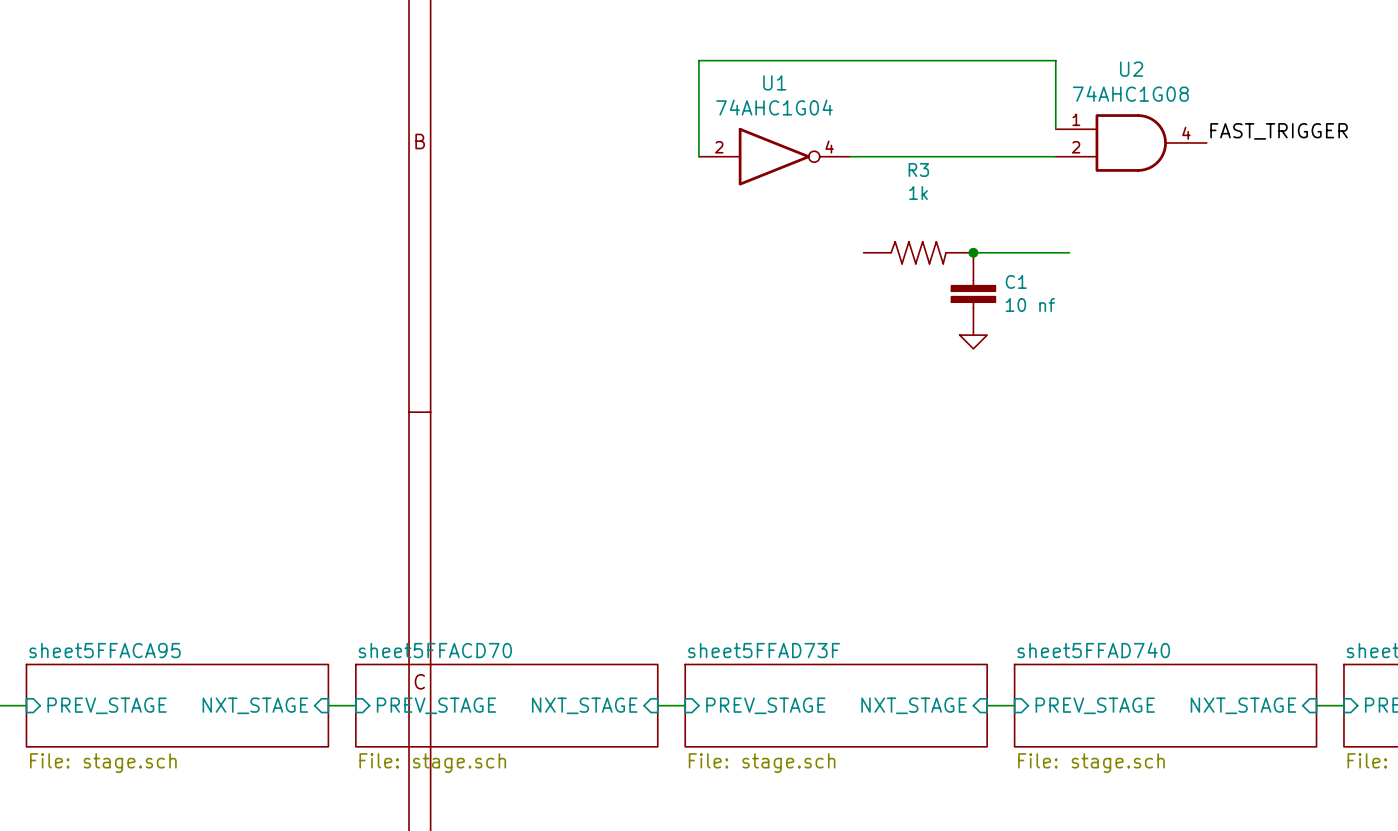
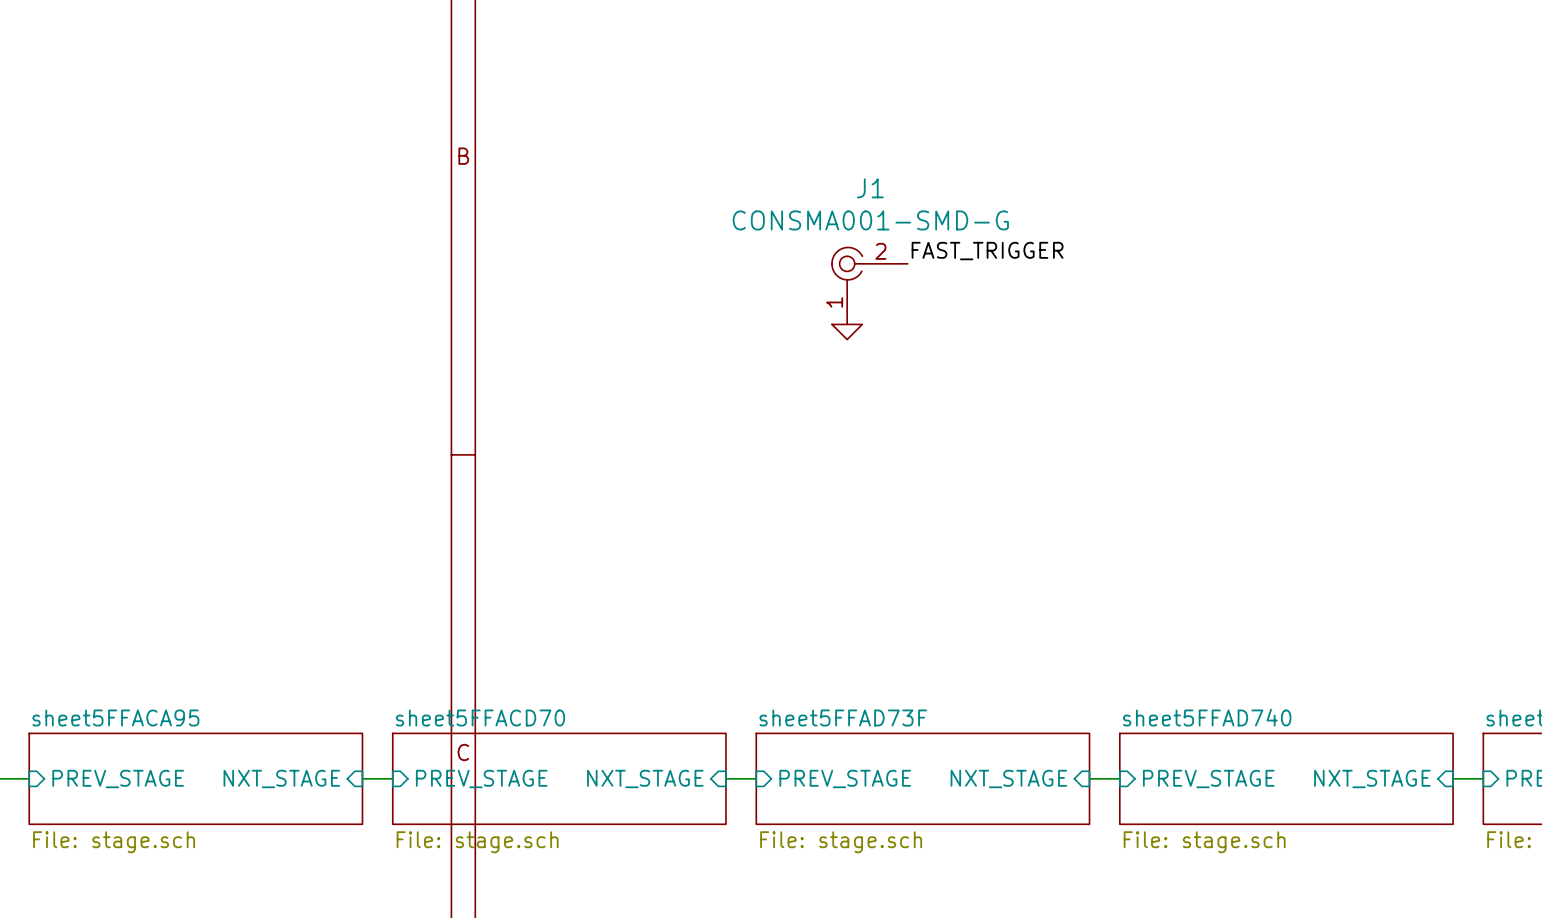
wire: (1055, 129) (1055, 60) (698, 60) (698, 156) -> none
label: FAST_TRIGGER (1279, 131) -> none
U2: 74AHC1G08 (1131, 142) -> none
U1: 74AHC1G04 (774, 156) -> none
wire: (849, 156) (1055, 156) -> none
label: none -> FAST_TRIGGER (987, 251)
R3: 1k (918, 252) -> none
wire: (973, 252) (1069, 252) -> none
junction: (973, 252) -> none
J1: none -> CONSMA001-SMD-G (869, 285)
C1: 10 nf (973, 293) -> none
power symbol position: (973, 341) -> (847, 332)

